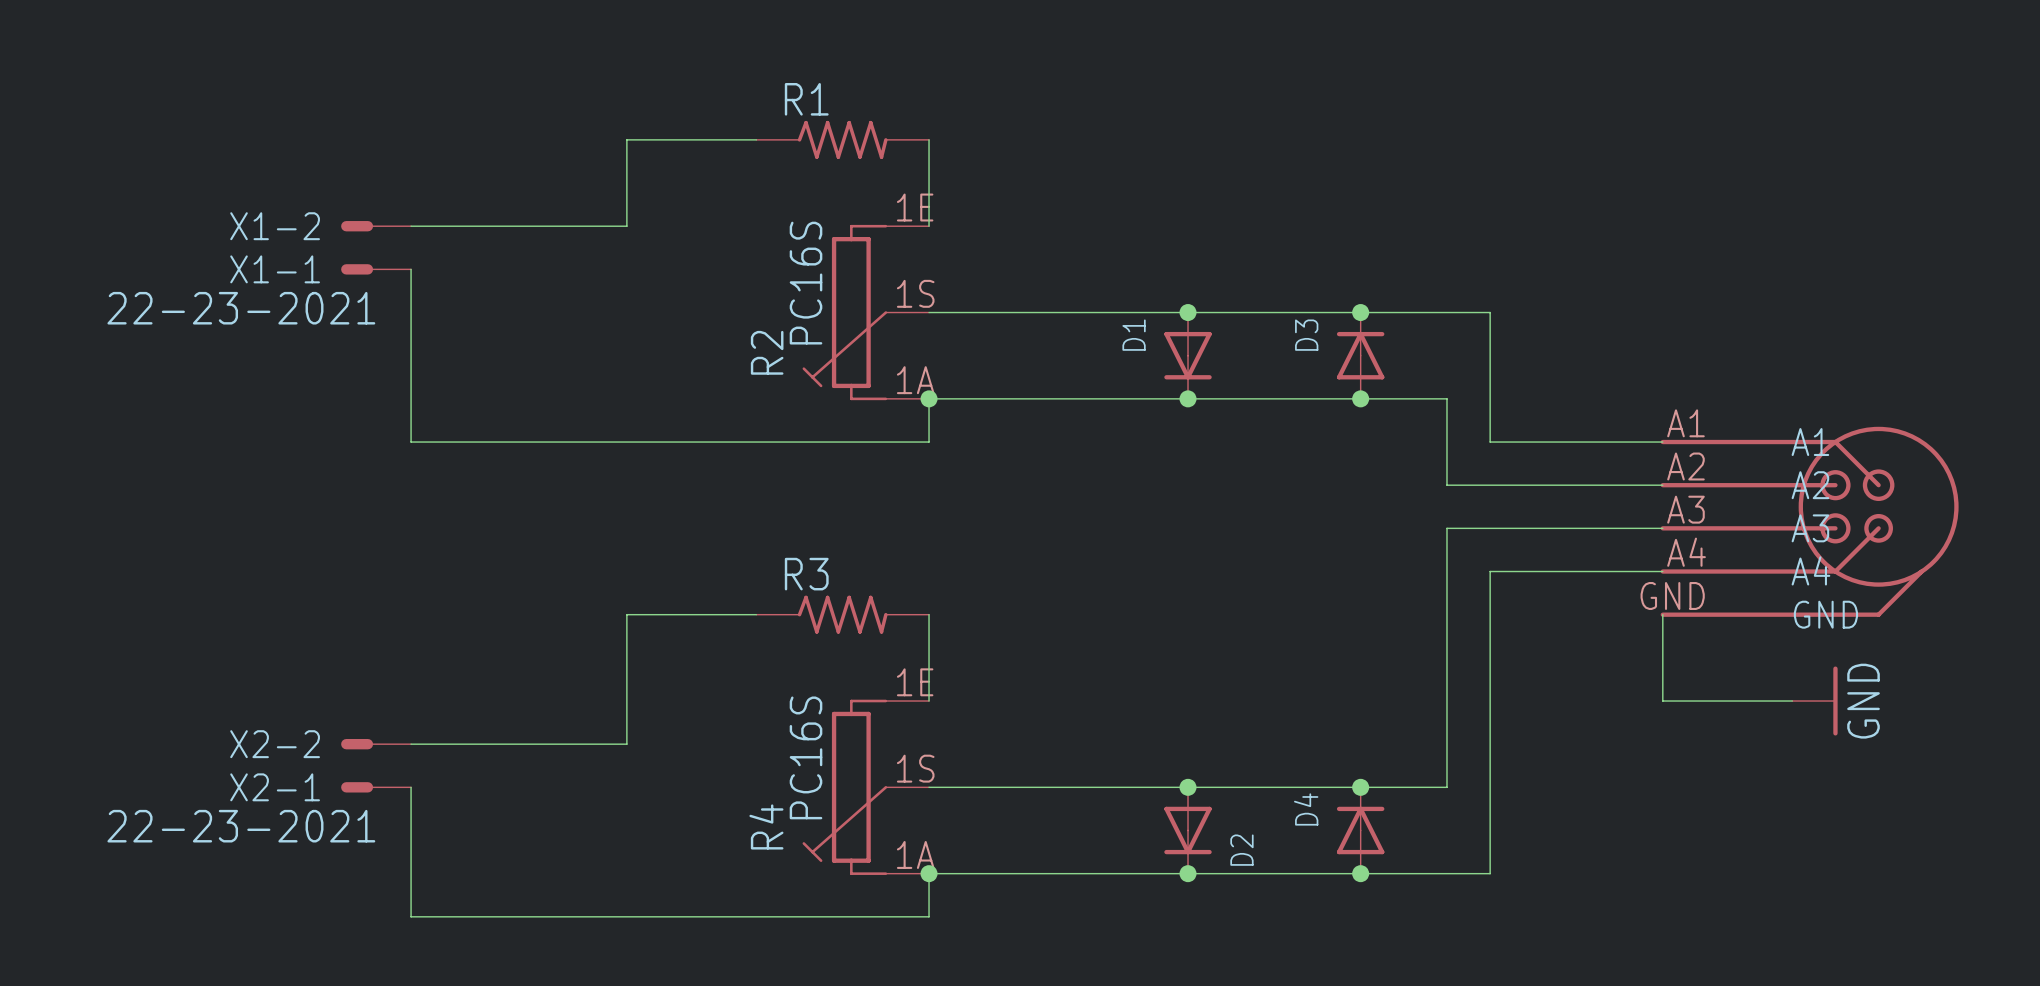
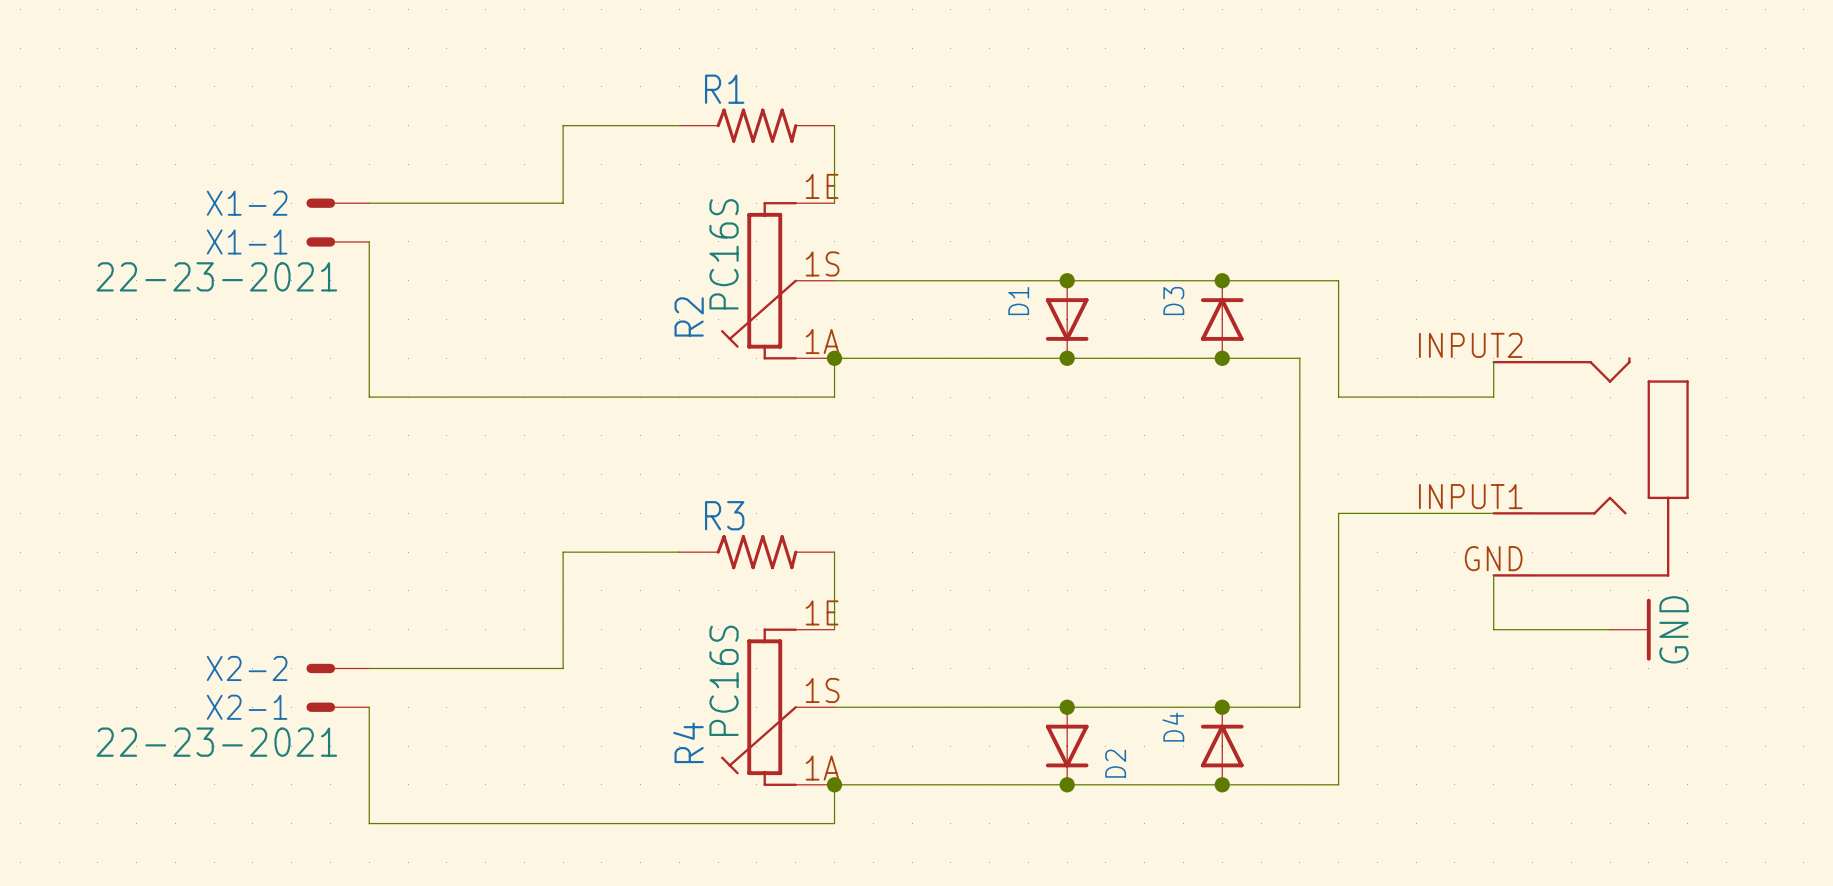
wire: none -> (1493, 362) (1493, 397)
wire: (1446, 485) (1662, 485) -> (1299, 435) (1299, 474)
part: none -> (1590, 466)
part: (1809, 521) -> none
wire: (1446, 528) (1662, 528) -> none
wire: (1662, 614) (1662, 640) -> none

